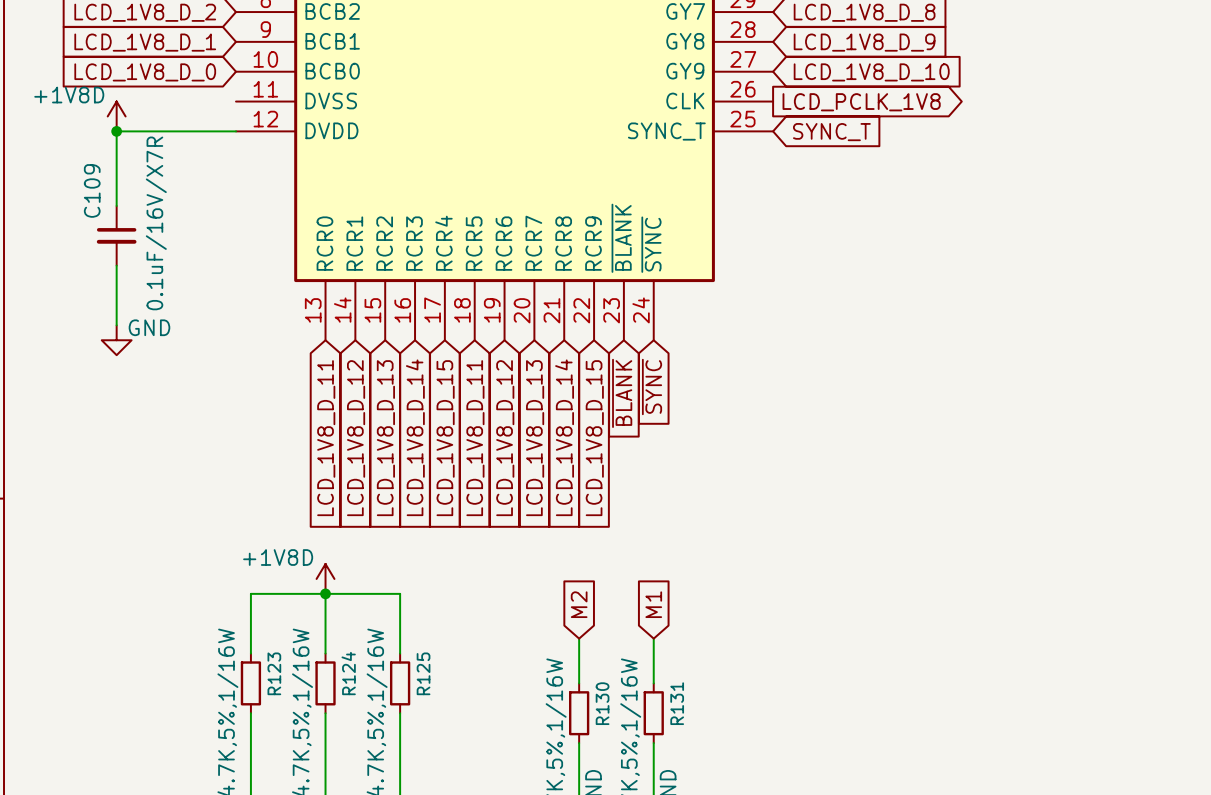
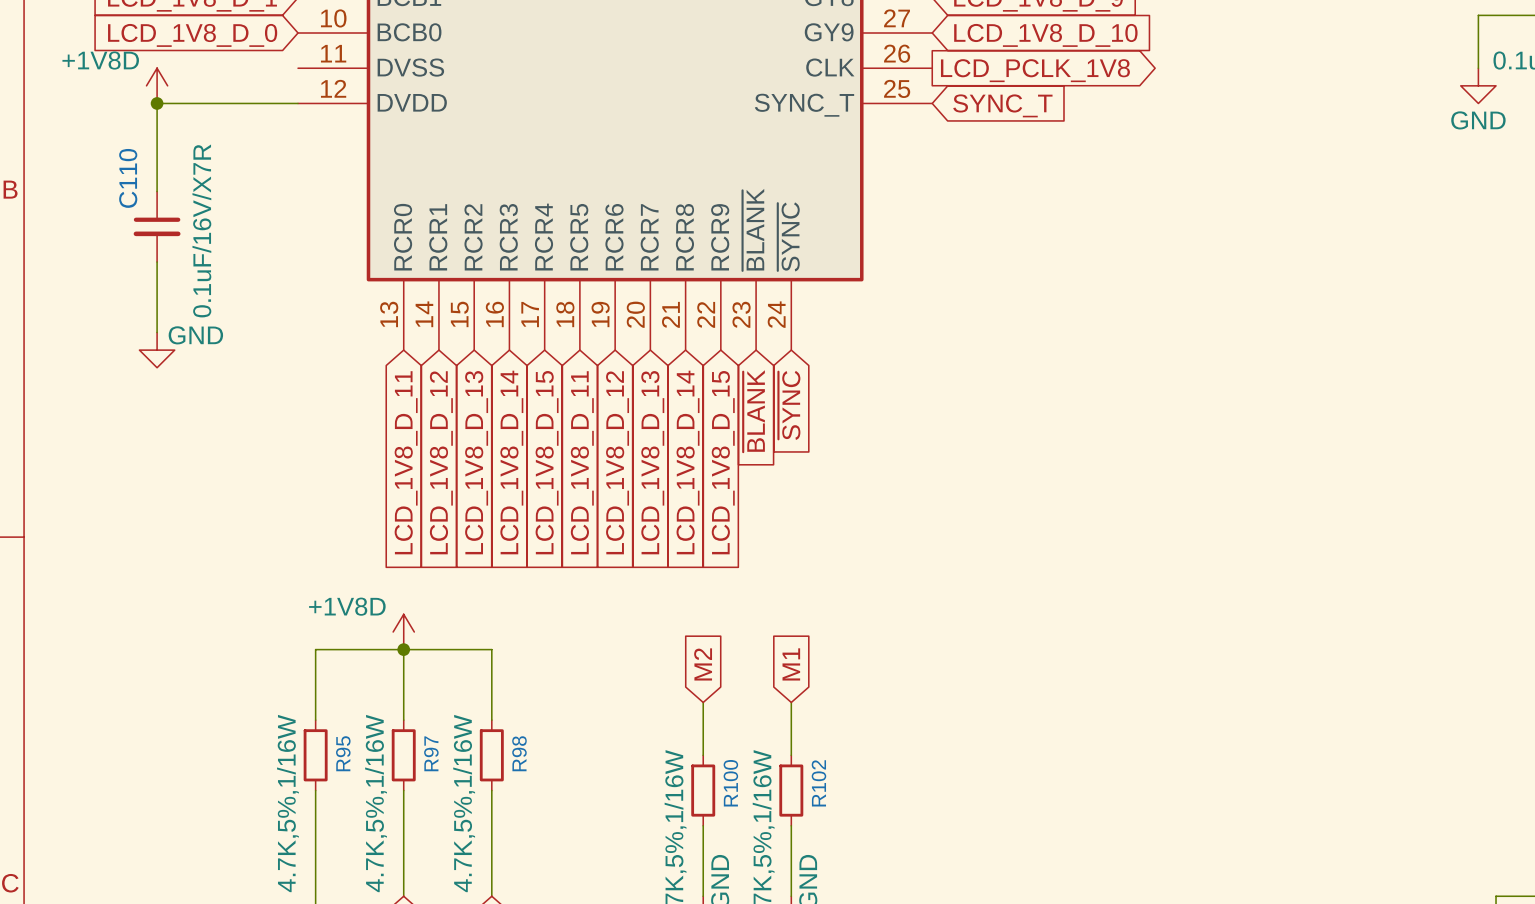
C109 name: C109 (92, 190) -> C110 (128, 178)
R123 name: R123 (274, 673) -> R95 (343, 753)
R124 name: R124 (348, 673) -> R97 (431, 753)
R125 name: R125 (423, 673) -> R98 (519, 753)
R130 name: R130 (602, 703) -> R100 (730, 783)
R131 name: R131 (677, 703) -> R102 (818, 783)

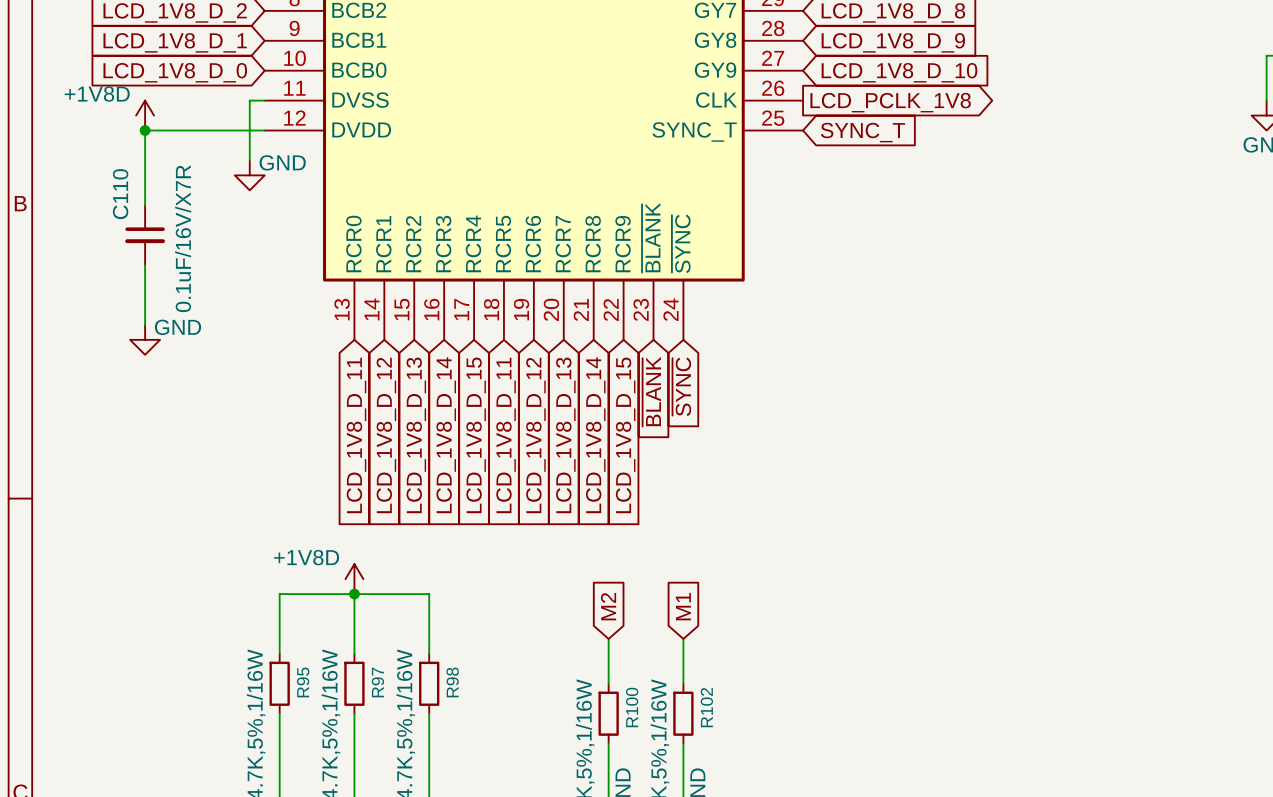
wire: none -> (264, 100) (249, 100) (249, 160)
power symbol: none -> GND (249, 175)

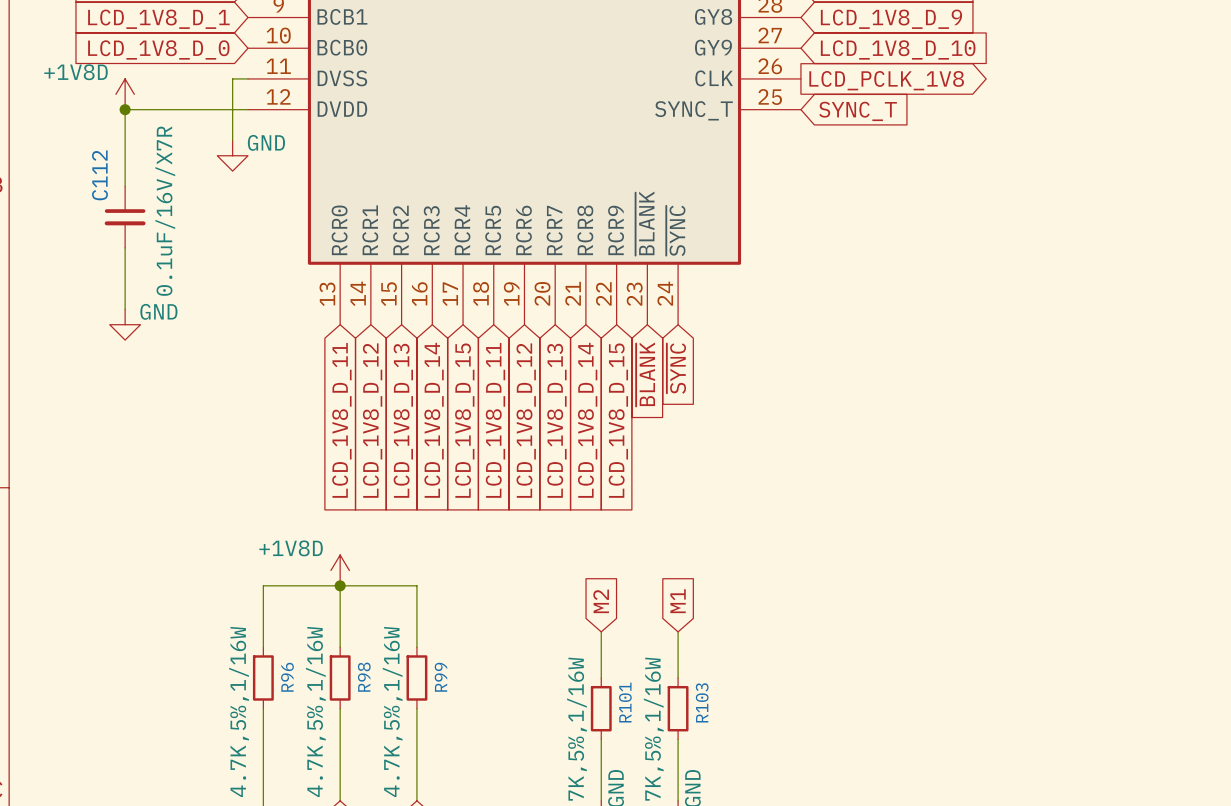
C110 name: C110 (120, 194) -> C112 (99, 175)
R95 name: R95 (303, 682) -> R96 (287, 677)
R97 name: R97 (377, 682) -> R98 (364, 677)
R98 name: R98 (452, 682) -> R99 (440, 677)
R100 name: R100 (632, 707) -> R101 (625, 702)
R102 name: R102 (706, 707) -> R103 (702, 702)

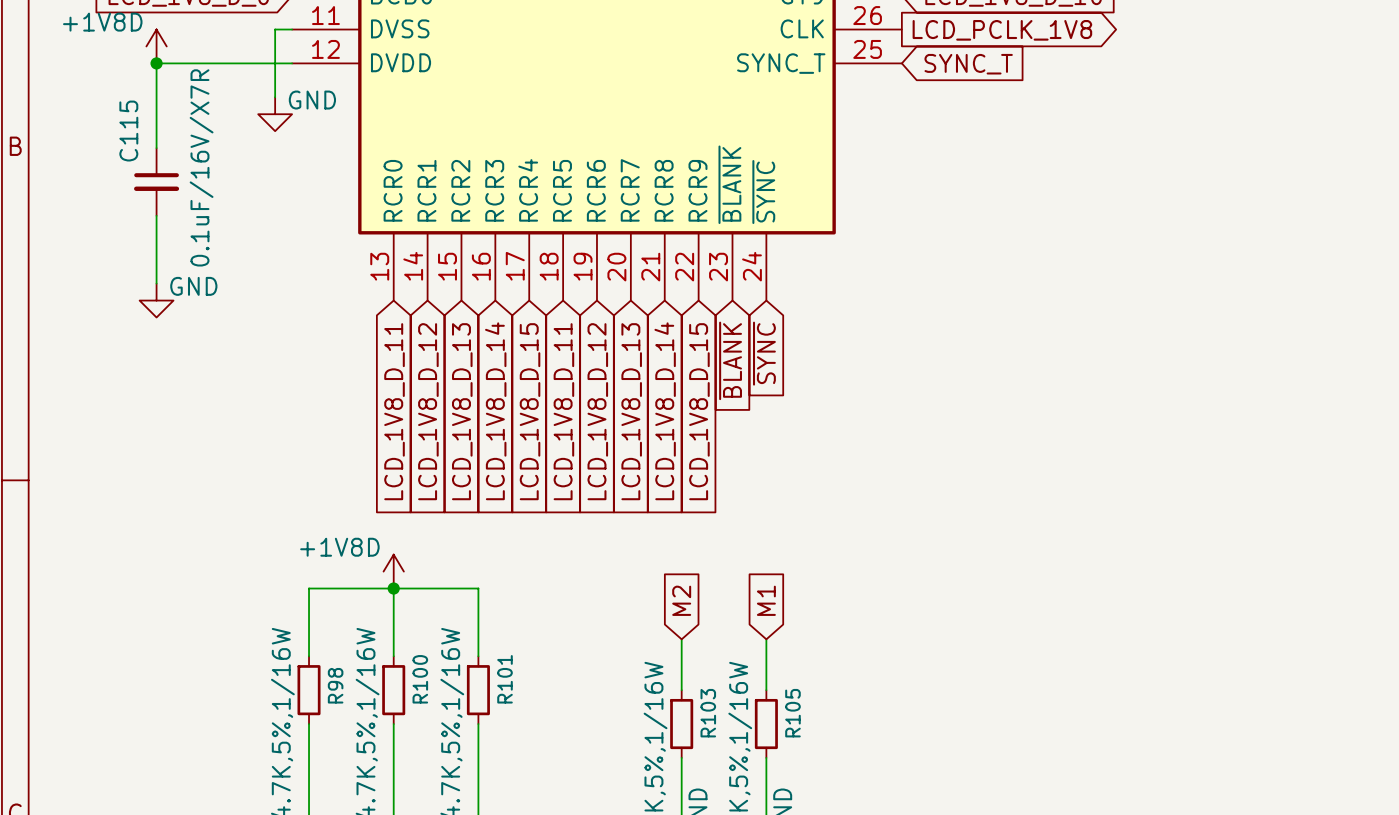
C112 name: C112 (99, 175) -> C115 (128, 131)
R96 name: R96 (287, 677) -> R98 (335, 685)
R98 name: R98 (364, 677) -> R100 (420, 679)
R99 name: R99 (440, 677) -> R101 (505, 679)
R101 name: R101 (625, 702) -> R103 (708, 713)
R103 name: R103 (702, 702) -> R105 (792, 713)

